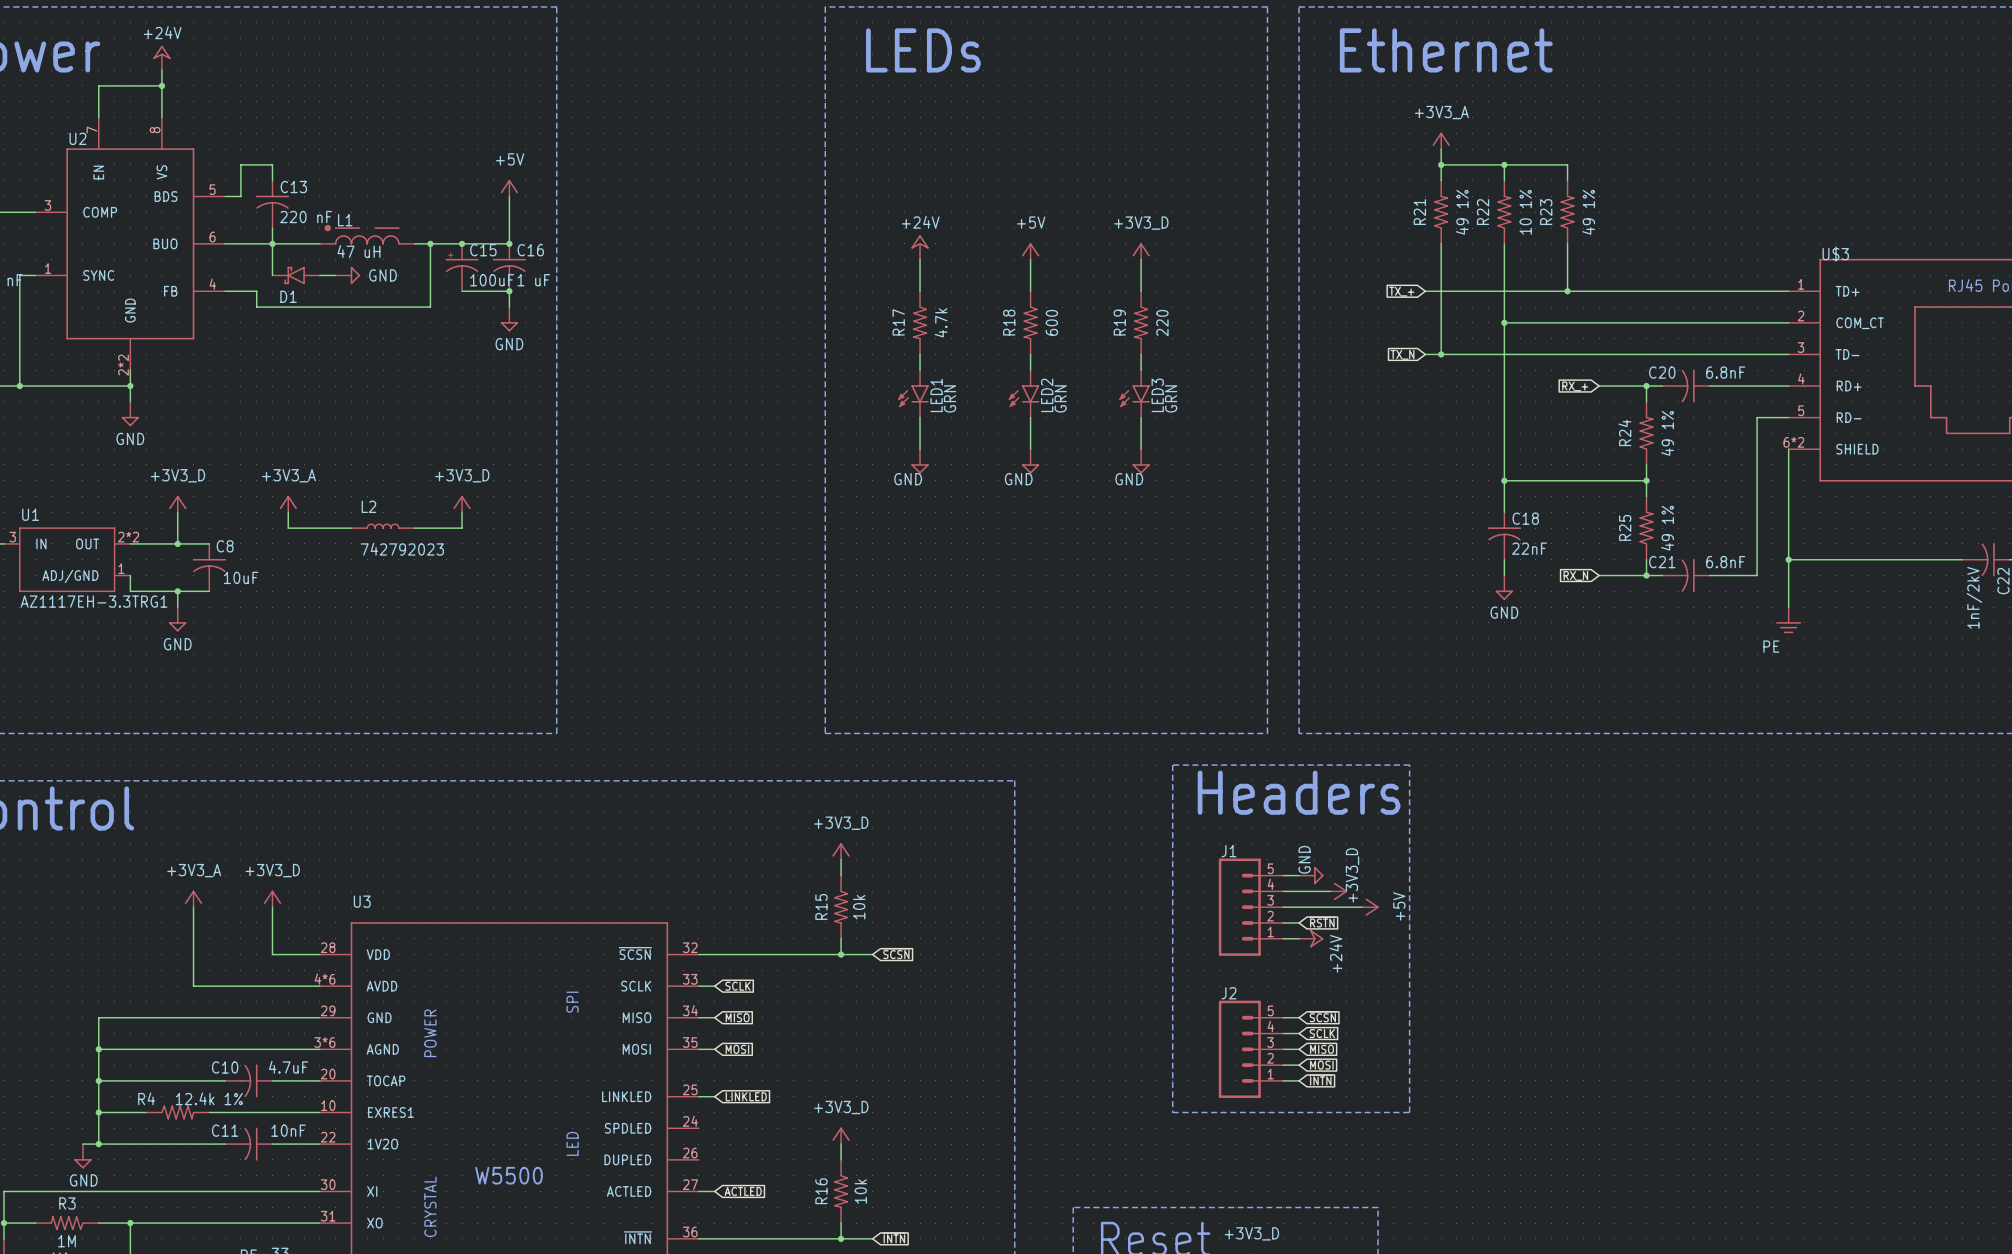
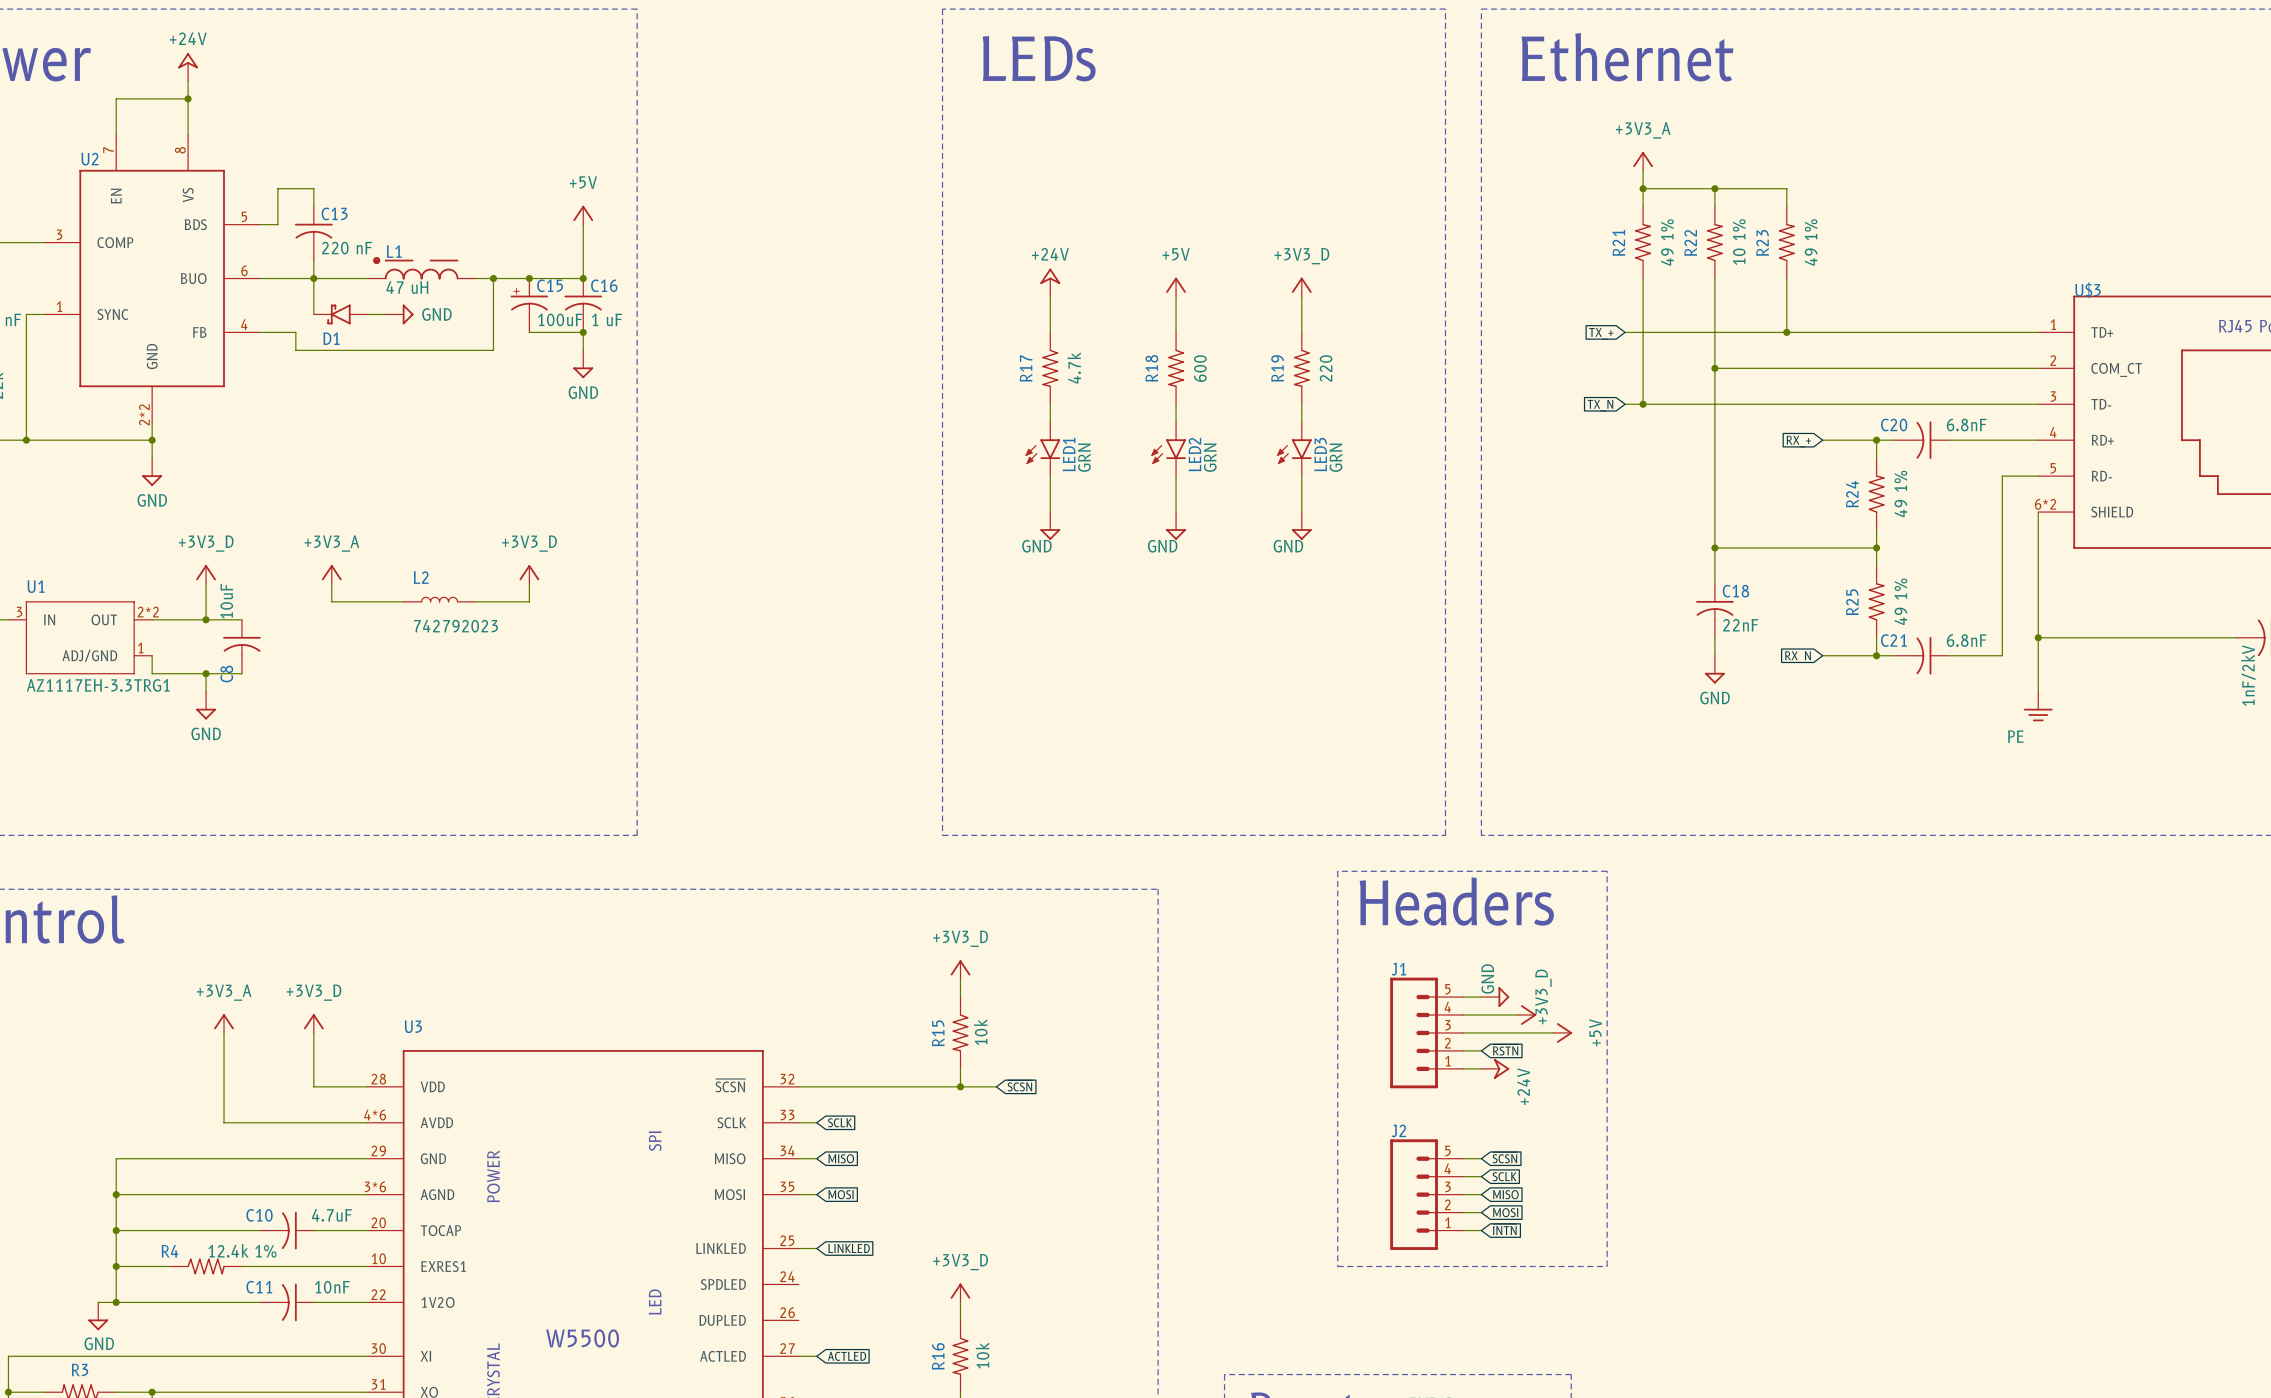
C8 name rotation: 0° (225, 546) -> 90° counterclockwise (226, 674)
C8 name position: C8 (225, 546) -> C8 (226, 674)
C8 value rotation: 0° (241, 577) -> 90° counterclockwise (226, 601)
C8 value position: 10uF (241, 577) -> 10uF (226, 601)

